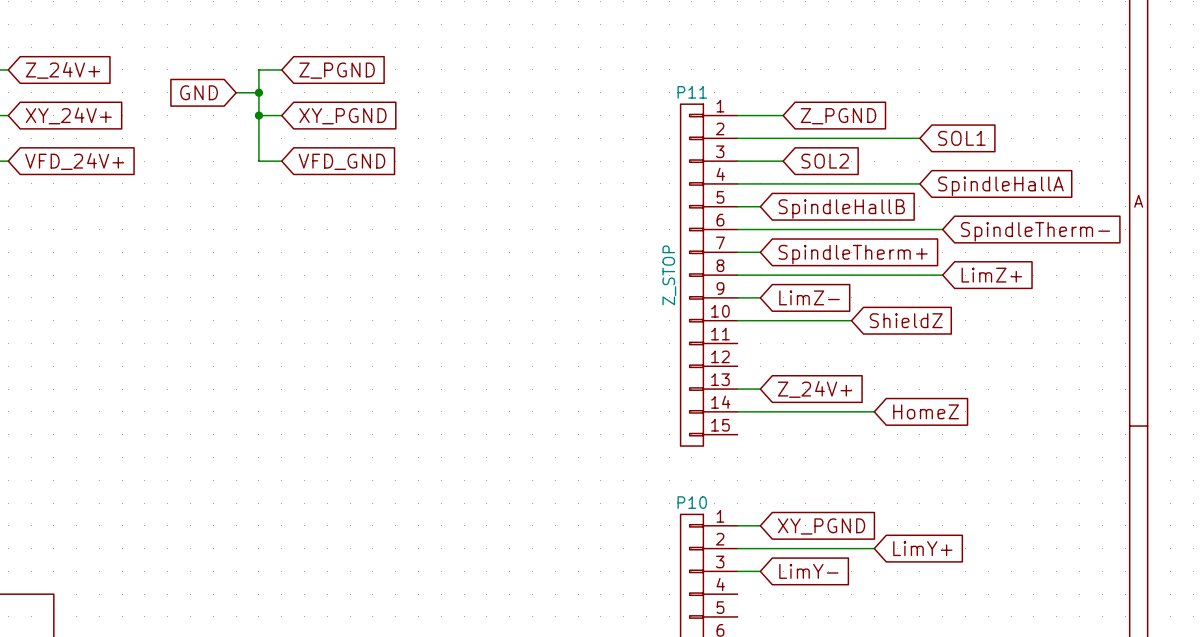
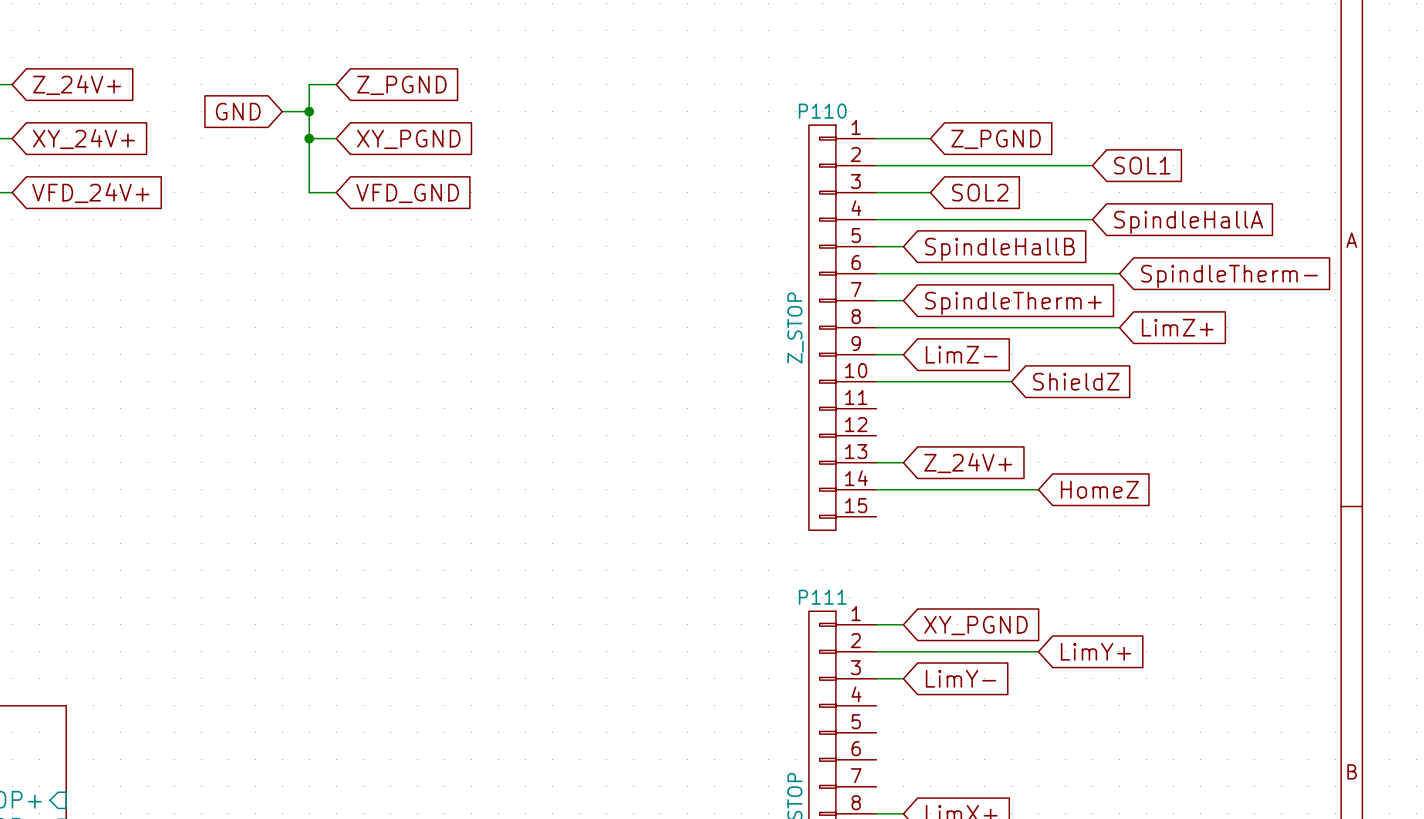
P11 name: P11 (692, 92) -> P110 (822, 111)
P10 name: P10 (692, 502) -> P111 (822, 597)

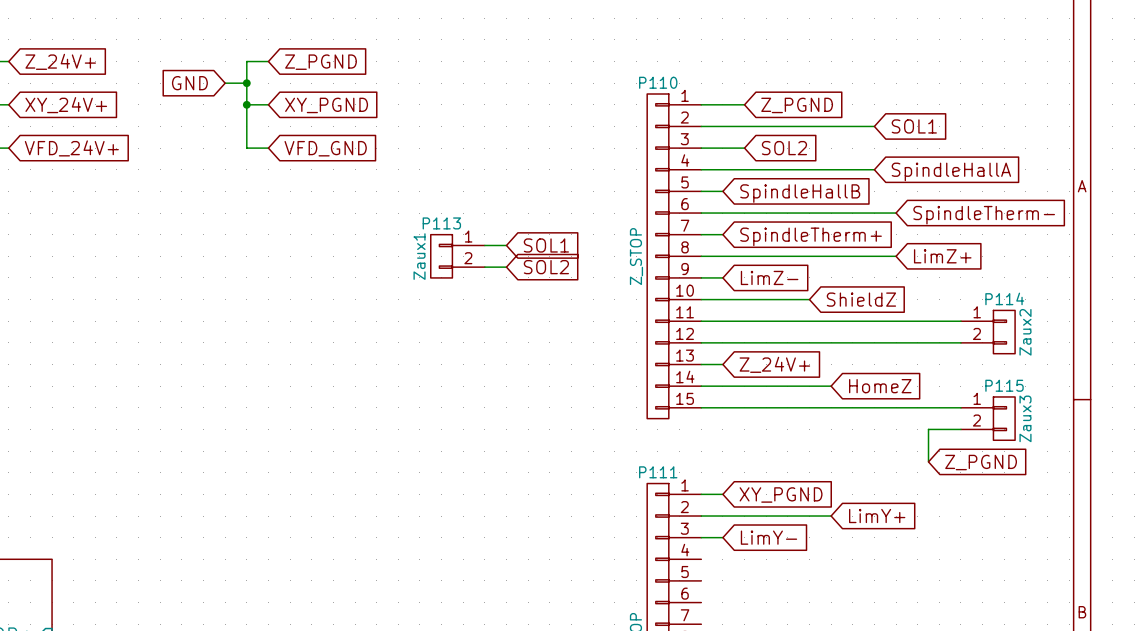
wire: none -> (484, 245) (506, 245)
global label: none -> SOL1 (546, 245)
P113: none -> Zaux1 (457, 256)
wire: none -> (484, 267) (506, 267)
global label: none -> SOL2 (546, 267)
wire: none -> (701, 321) (960, 321)
P114: none -> Zaux2 (988, 332)
wire: none -> (701, 342) (960, 342)
wire: none -> (701, 407) (960, 407)
P115: none -> Zaux3 (988, 418)
wire: none -> (960, 429) (928, 429) (928, 461)
global label: none -> Z_PGND (981, 462)

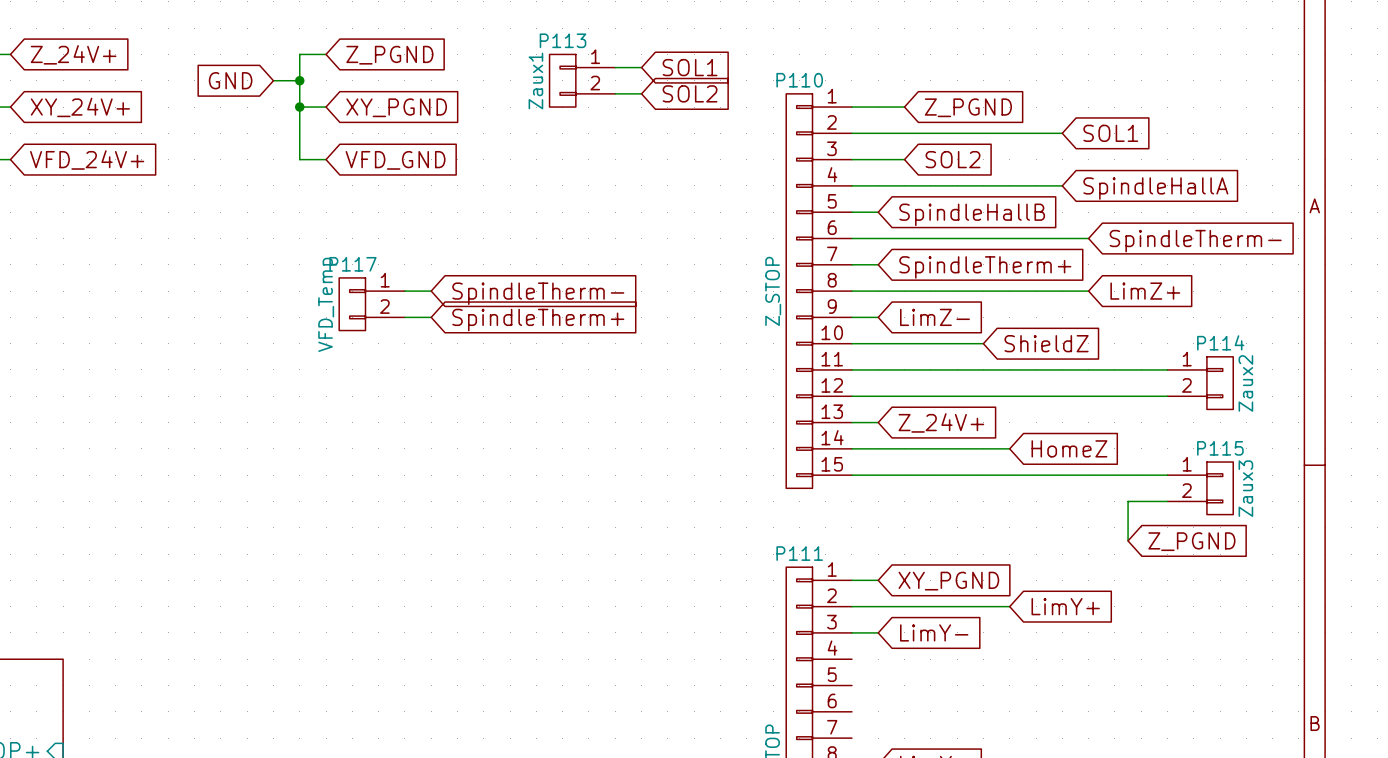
wire: none -> (615, 67) (641, 67)
wire: none -> (615, 93) (641, 93)
wire: (484, 245) (506, 245) -> (404, 291) (431, 291)
global label position: SOL1 (546, 245) -> SOL1 (690, 67)
P113 position: (457, 256) -> (582, 80)
global label: none -> SpindleTherm- (538, 293)
P117: none -> VFD_Temp (372, 304)
wire: (484, 267) (506, 267) -> (404, 317) (431, 317)
global label position: SOL2 (546, 267) -> SOL2 (690, 93)
global label: none -> SpindleTherm+ (538, 320)

